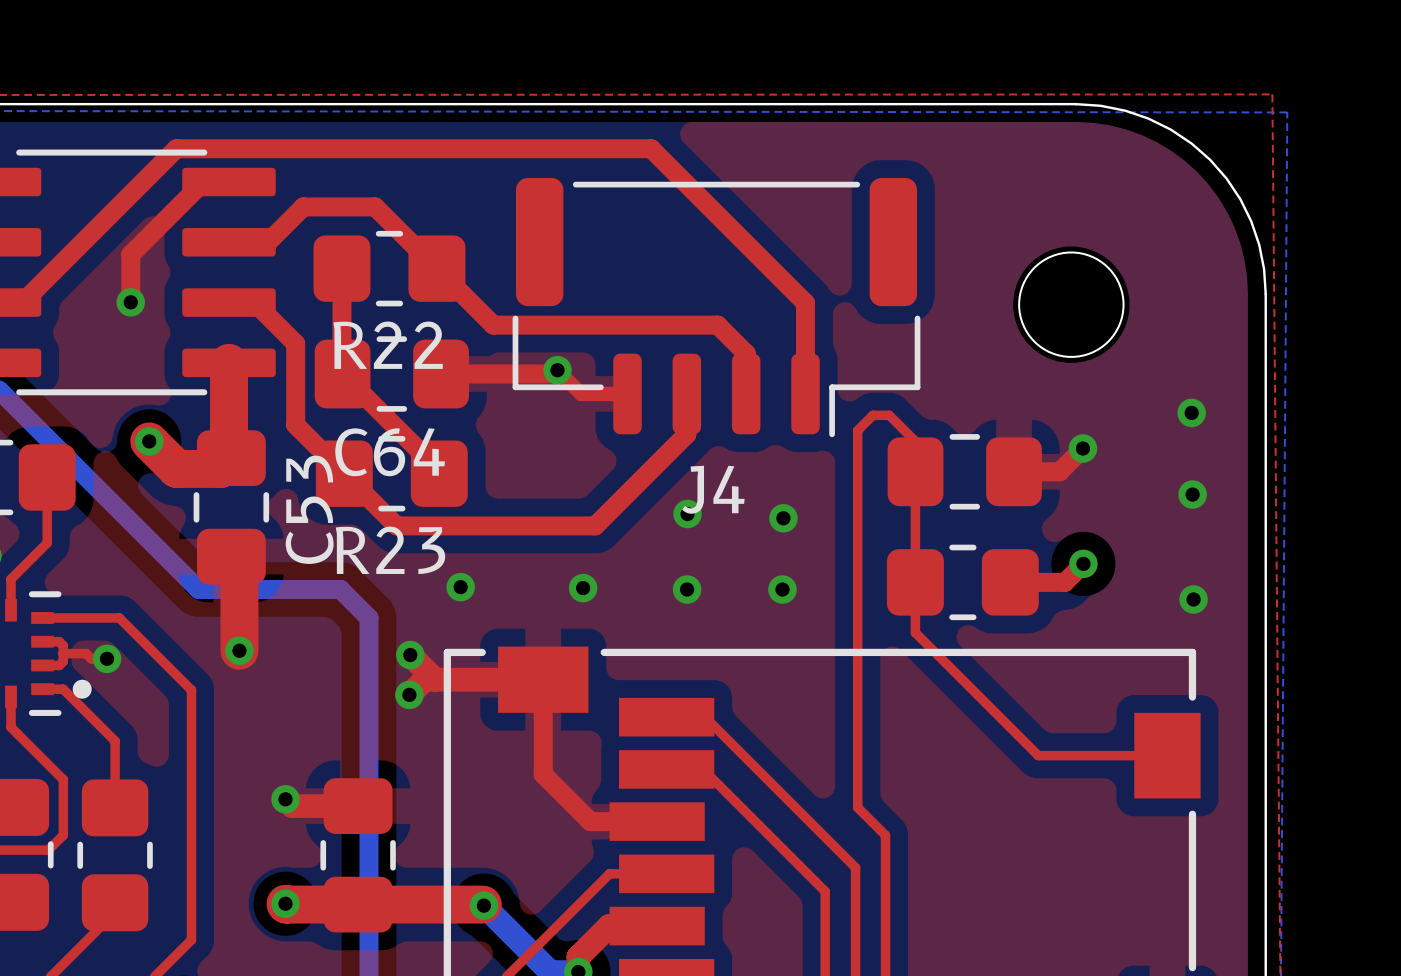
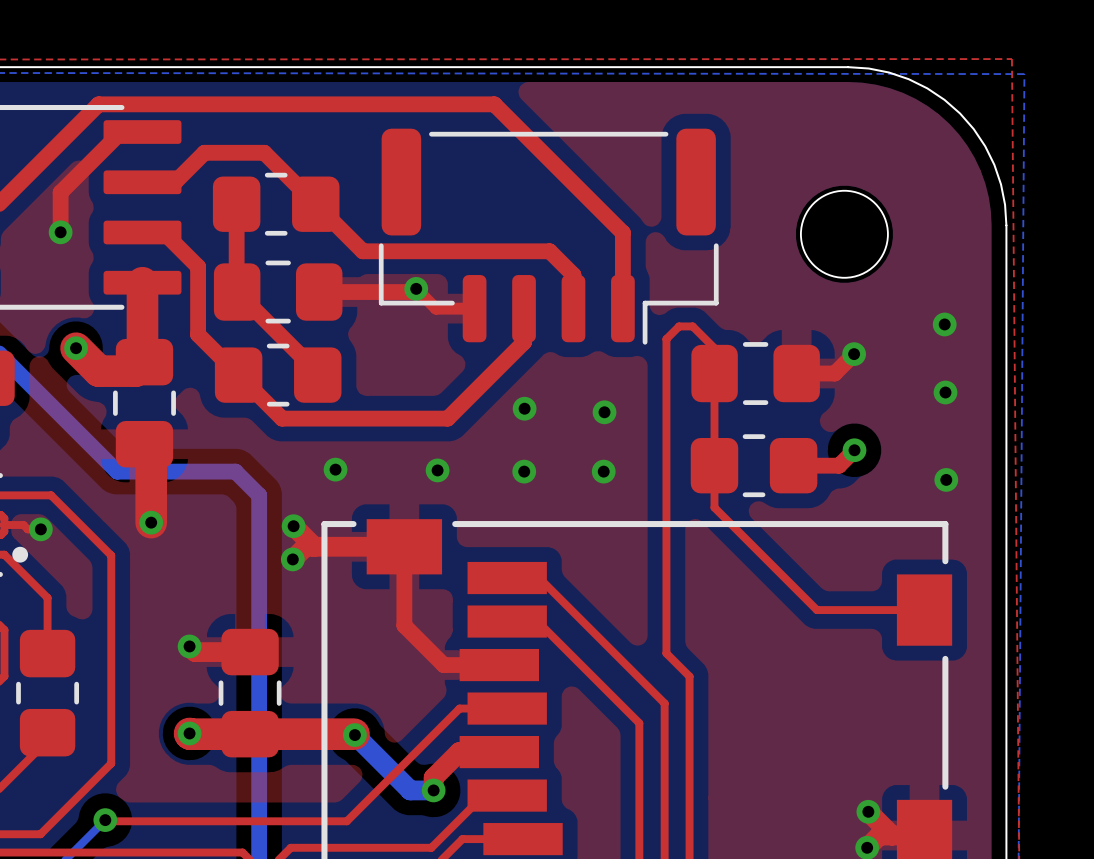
R22 name: R22 (388, 345) -> none
C64 name: C64 (390, 452) -> none
J4 name: J4 (713, 489) -> none
C53 name: C53 (309, 509) -> none
R23 name: R23 (390, 550) -> none

